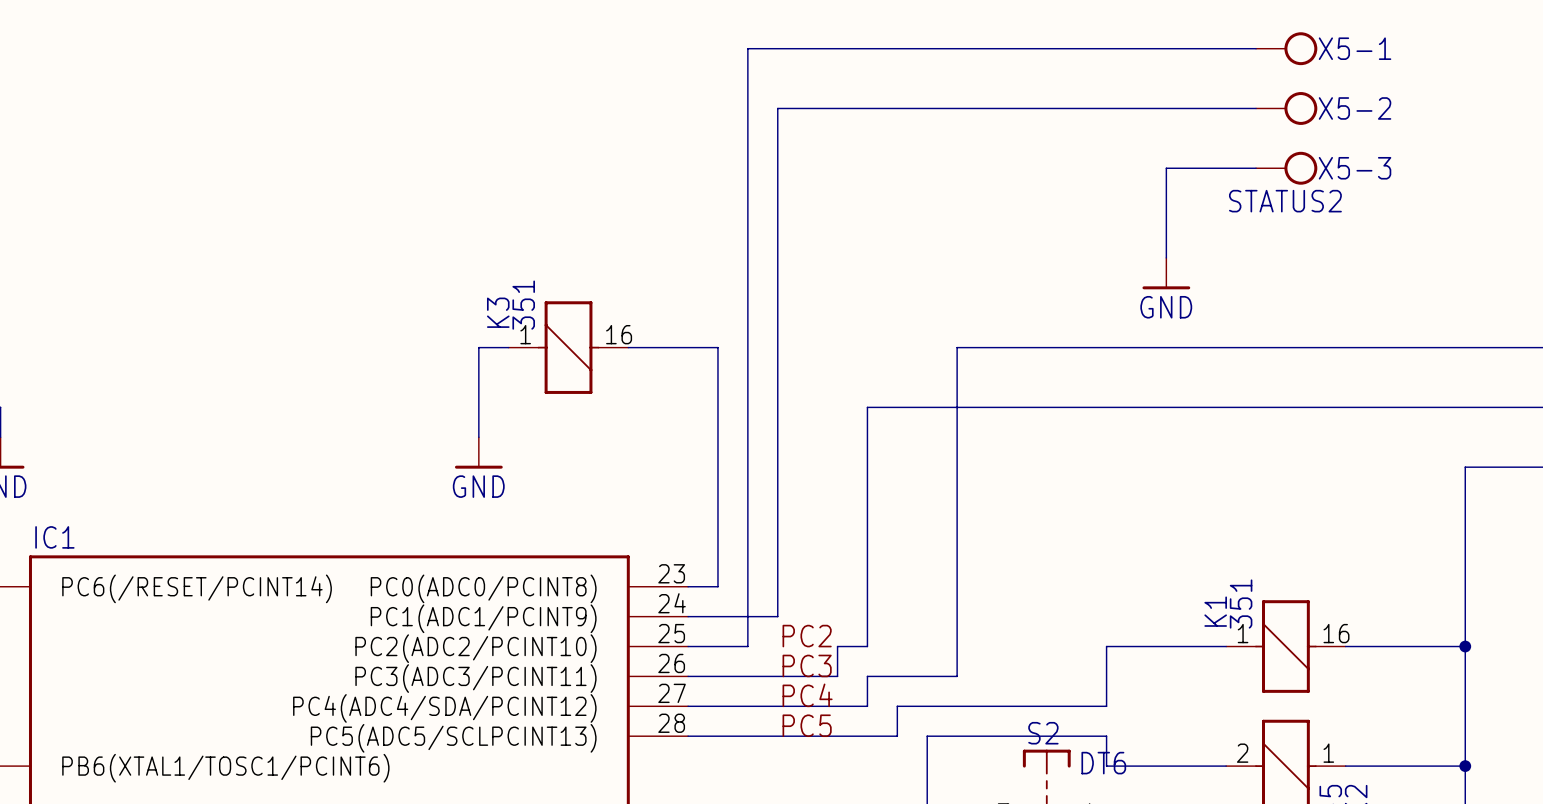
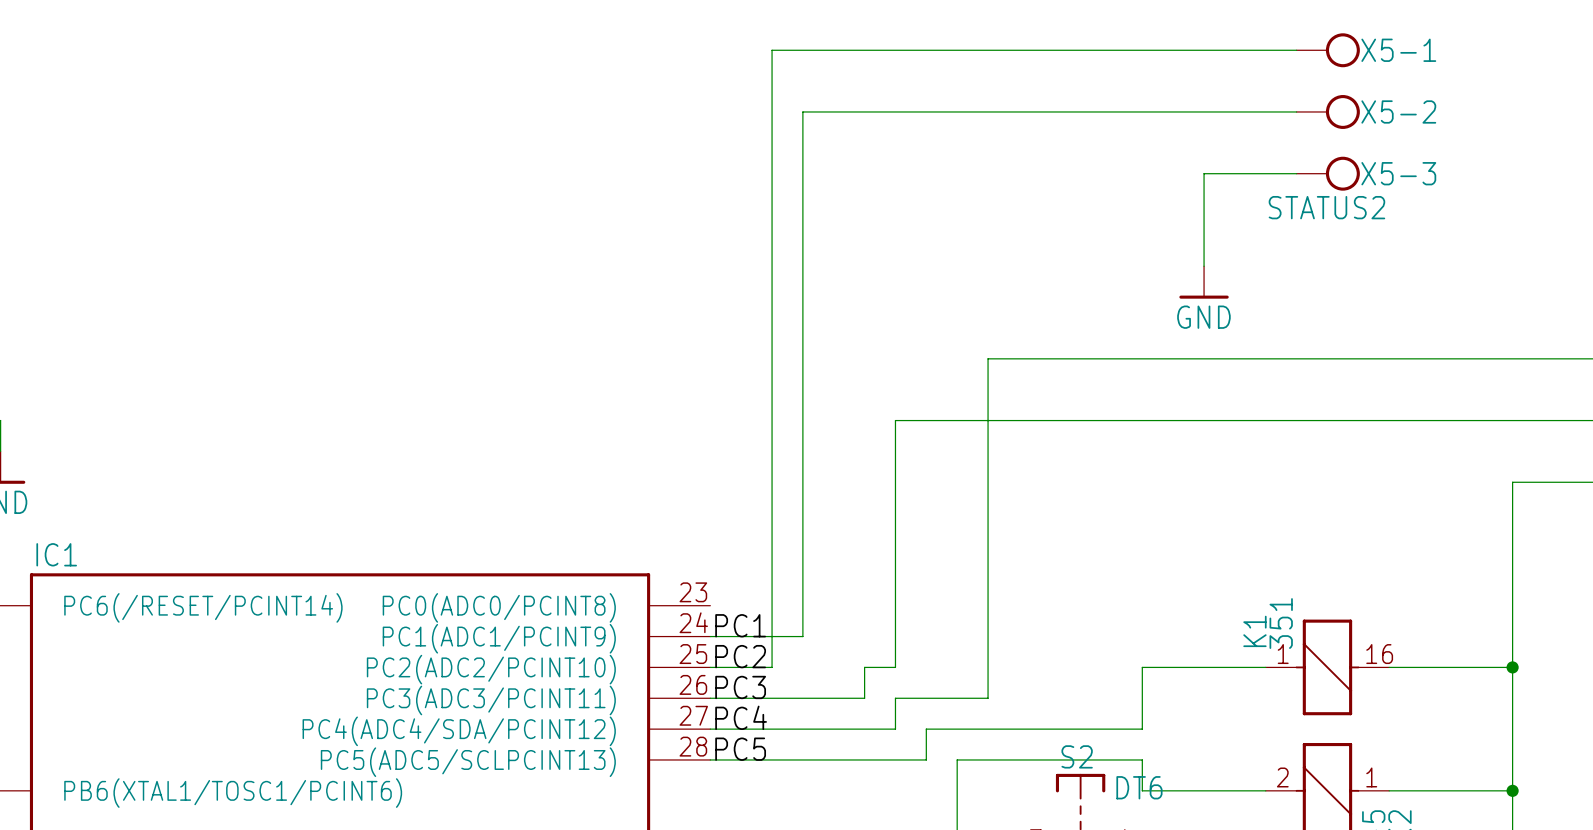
wire: (508, 347) (478, 347) (478, 437) -> none
K3: 351 (568, 347) -> none
wire: (628, 347) (717, 347) (717, 586) (688, 586) -> none
power symbol: GND (478, 452) -> none
label: none -> PC1 (740, 625)
label position: PC2 (807, 636) -> PC2 (740, 656)
label position: PC3 (807, 665) -> PC3 (740, 687)
label position: PC4 (807, 695) -> PC4 (741, 717)
label position: PC5 (807, 725) -> PC5 (740, 749)

